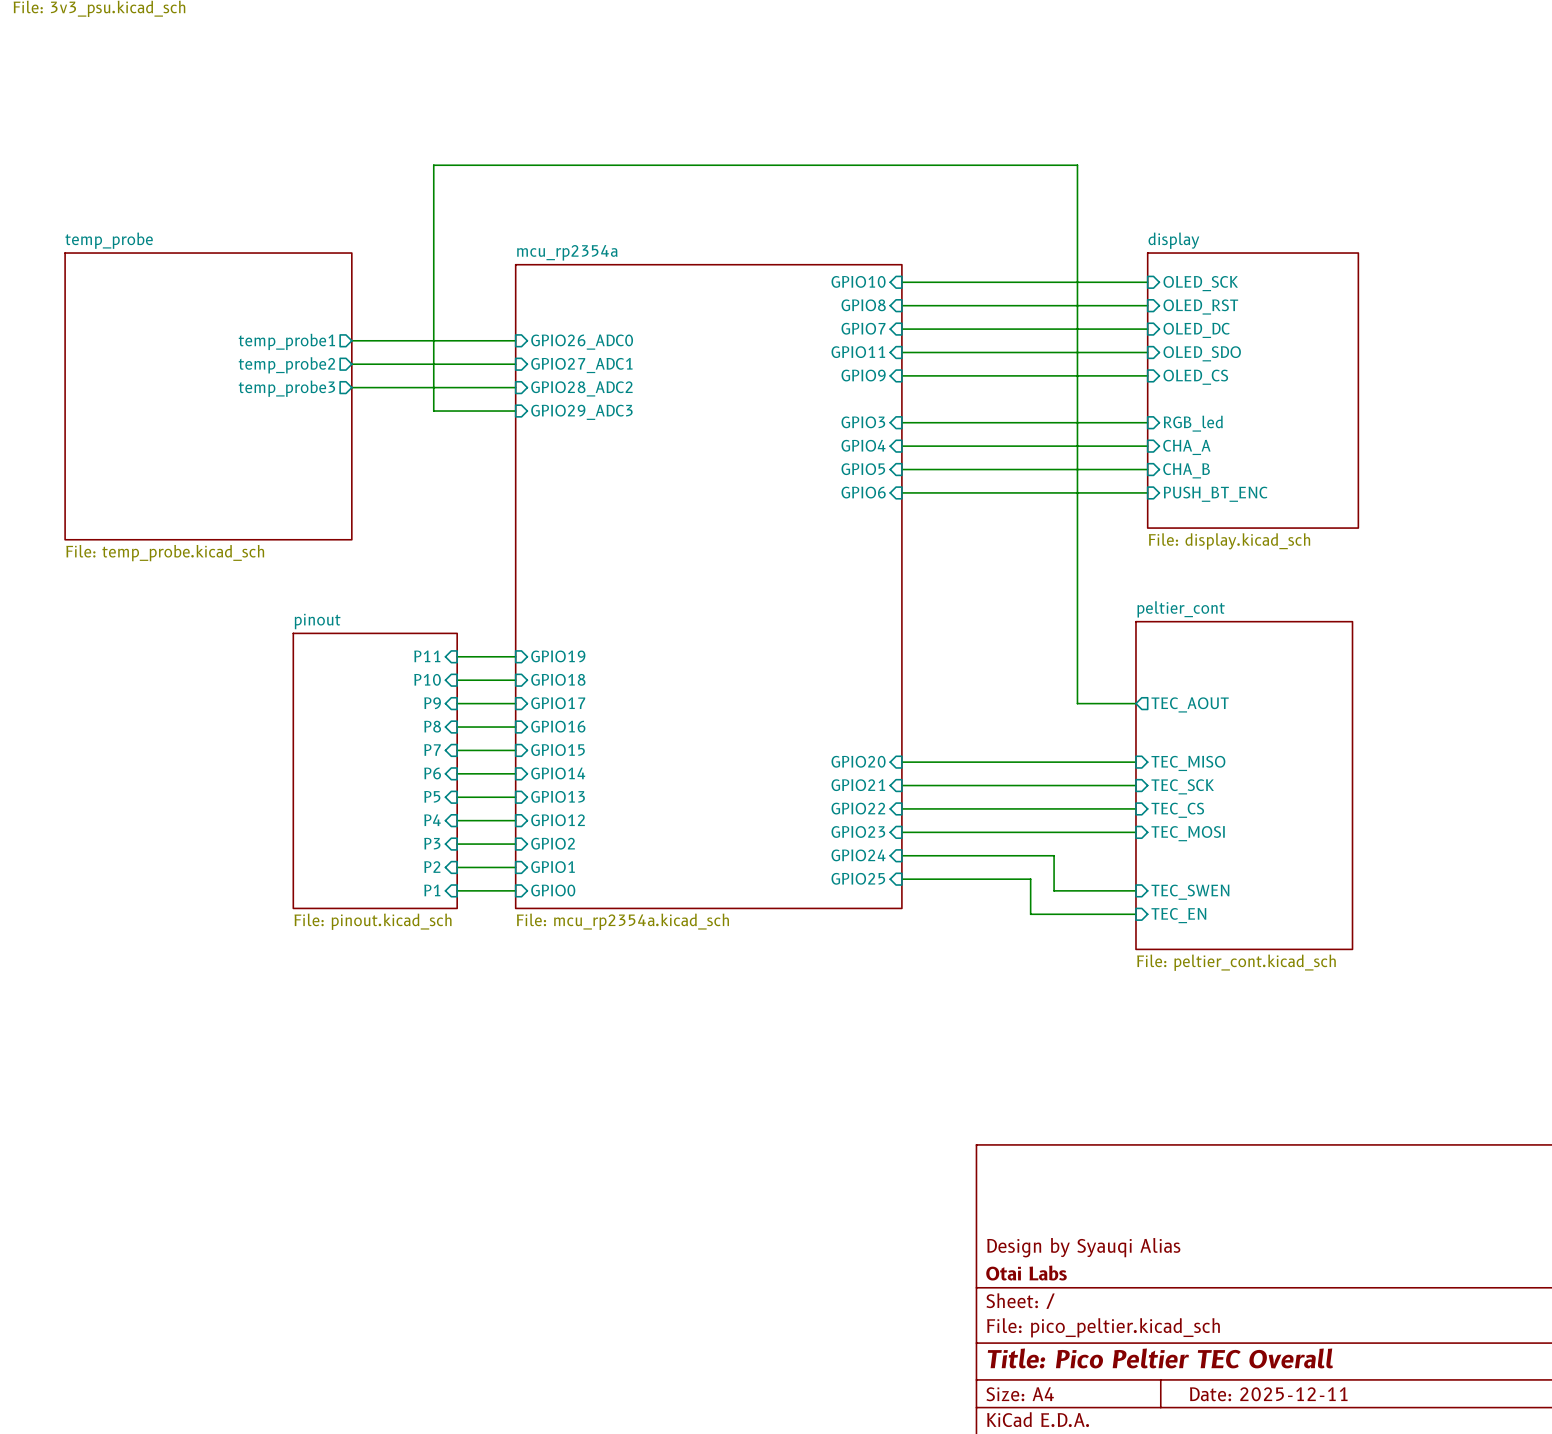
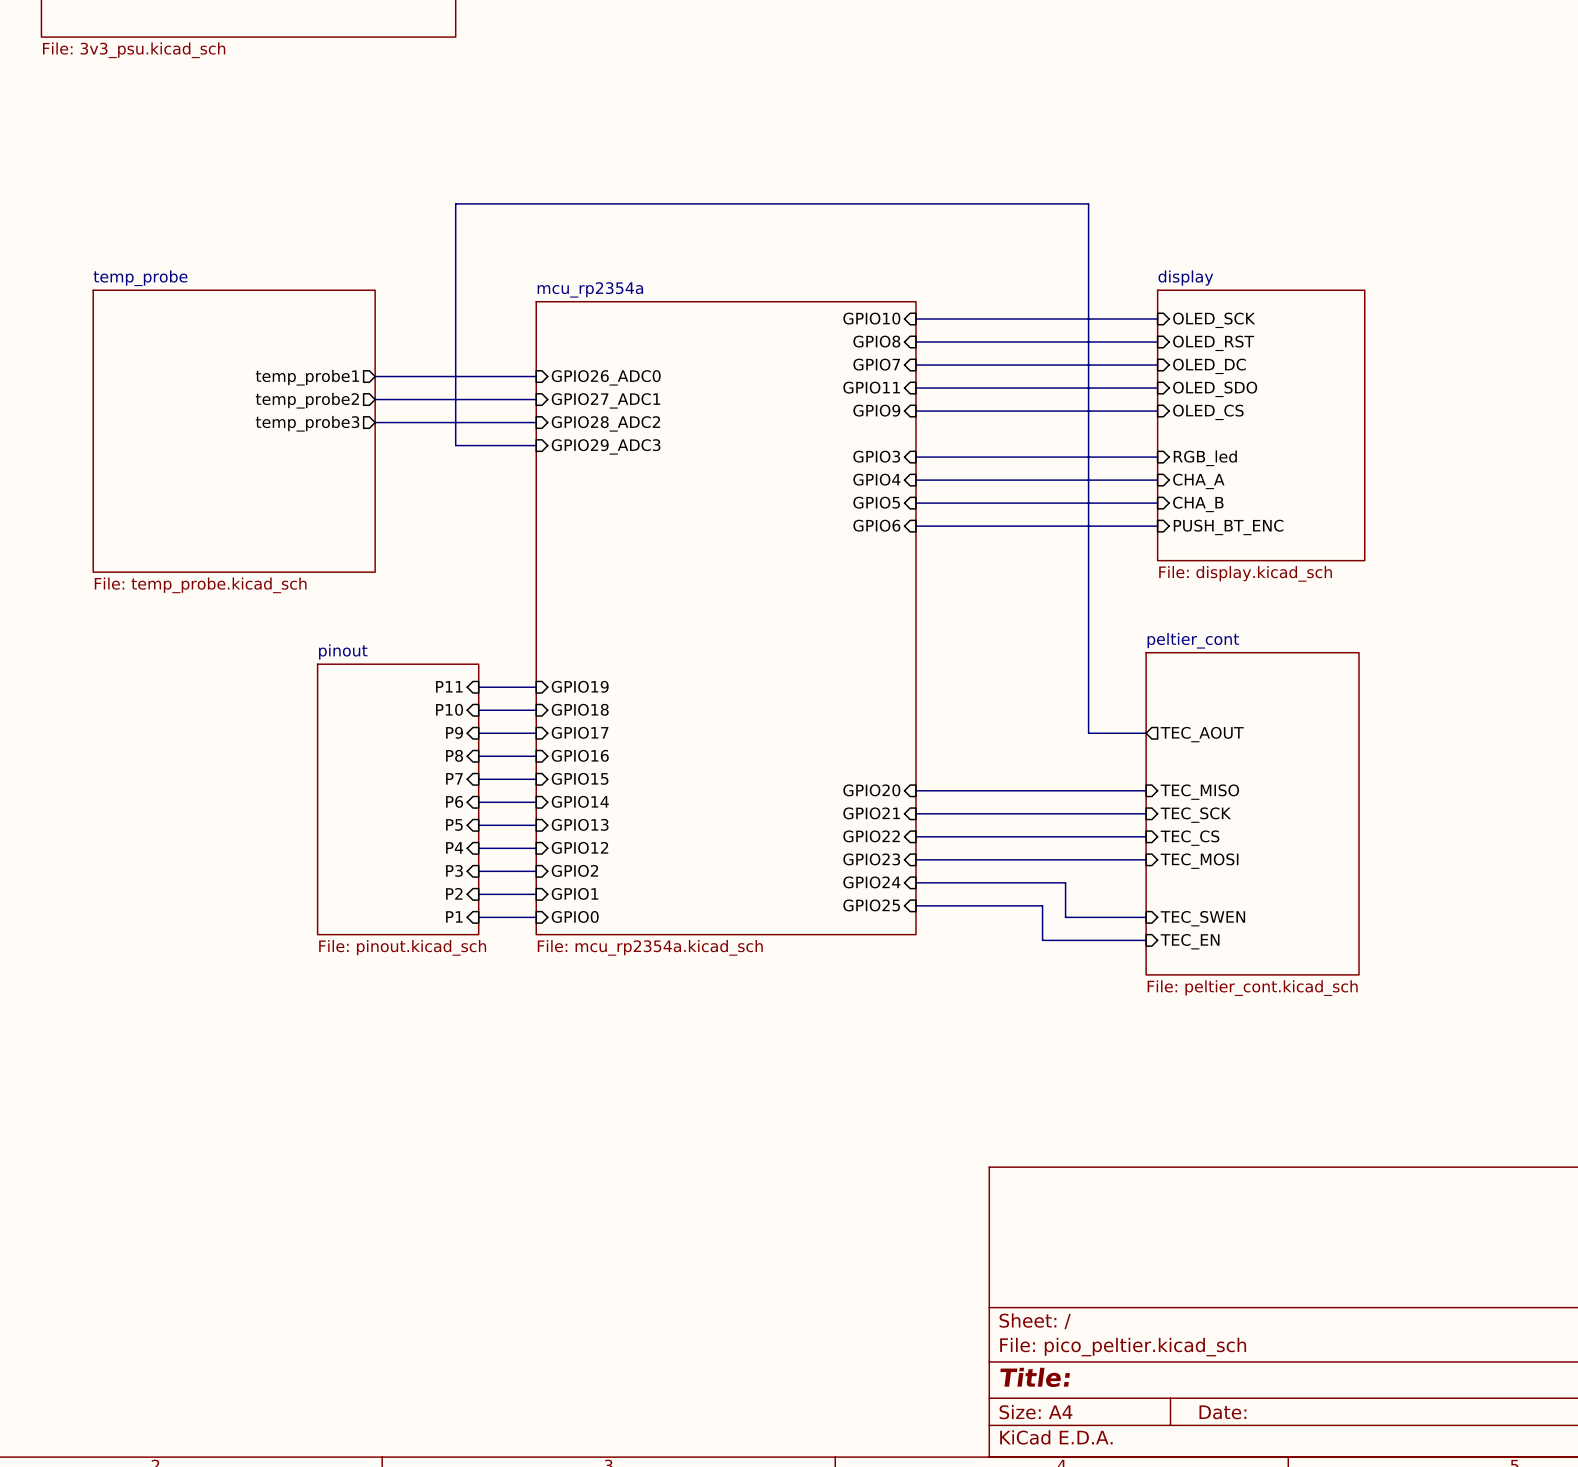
title block: Design by Syauqi Alias (1083, 1247) -> none
title block: Otai Labs (1026, 1273) -> none
title block: Title: Pico Peltier TEC Overall (1160, 1358) -> Title: (1035, 1377)
title block: Date: 2025-12-11 (1268, 1394) -> Date: (1222, 1412)

